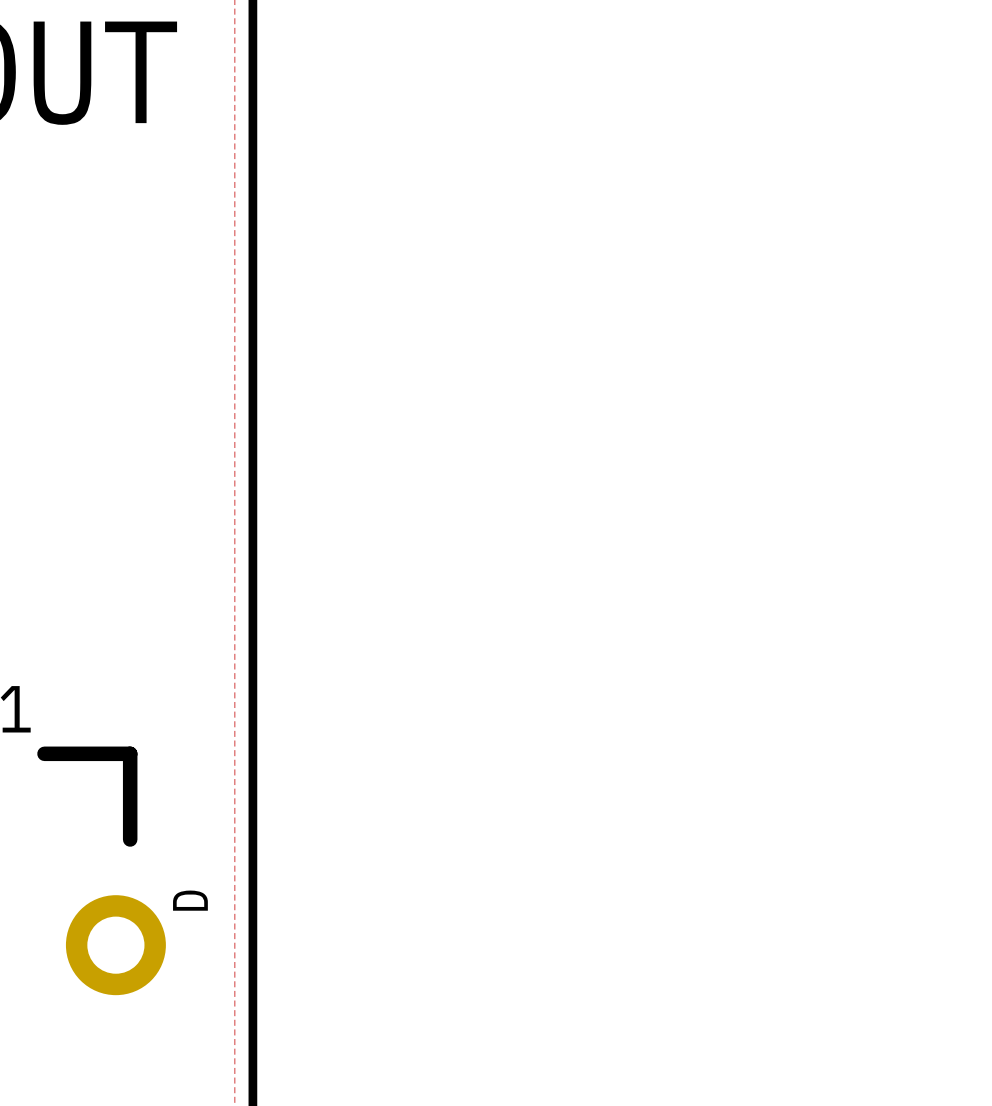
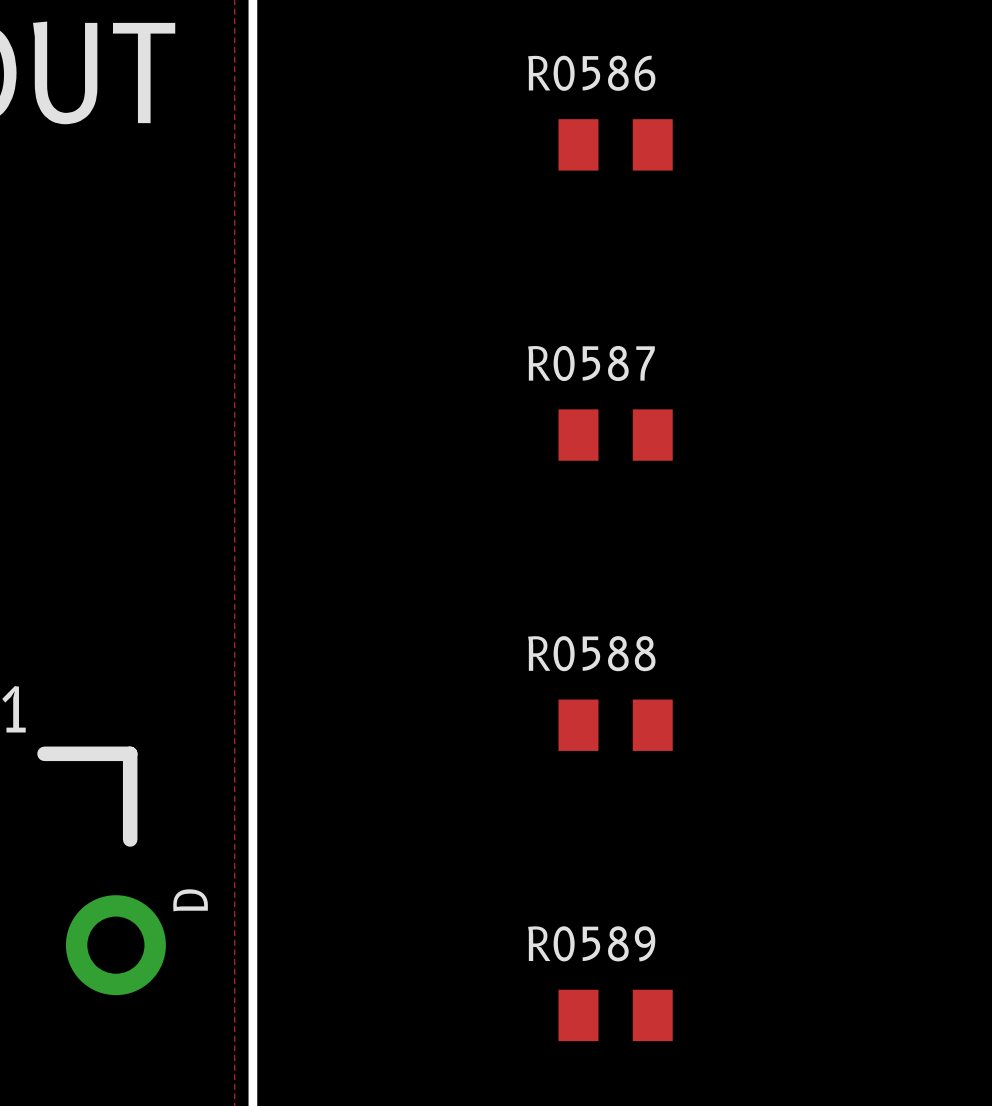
R0586: none -> (615, 144)
R0587: none -> (615, 435)
R0588: none -> (615, 725)
R0589: none -> (615, 1015)

